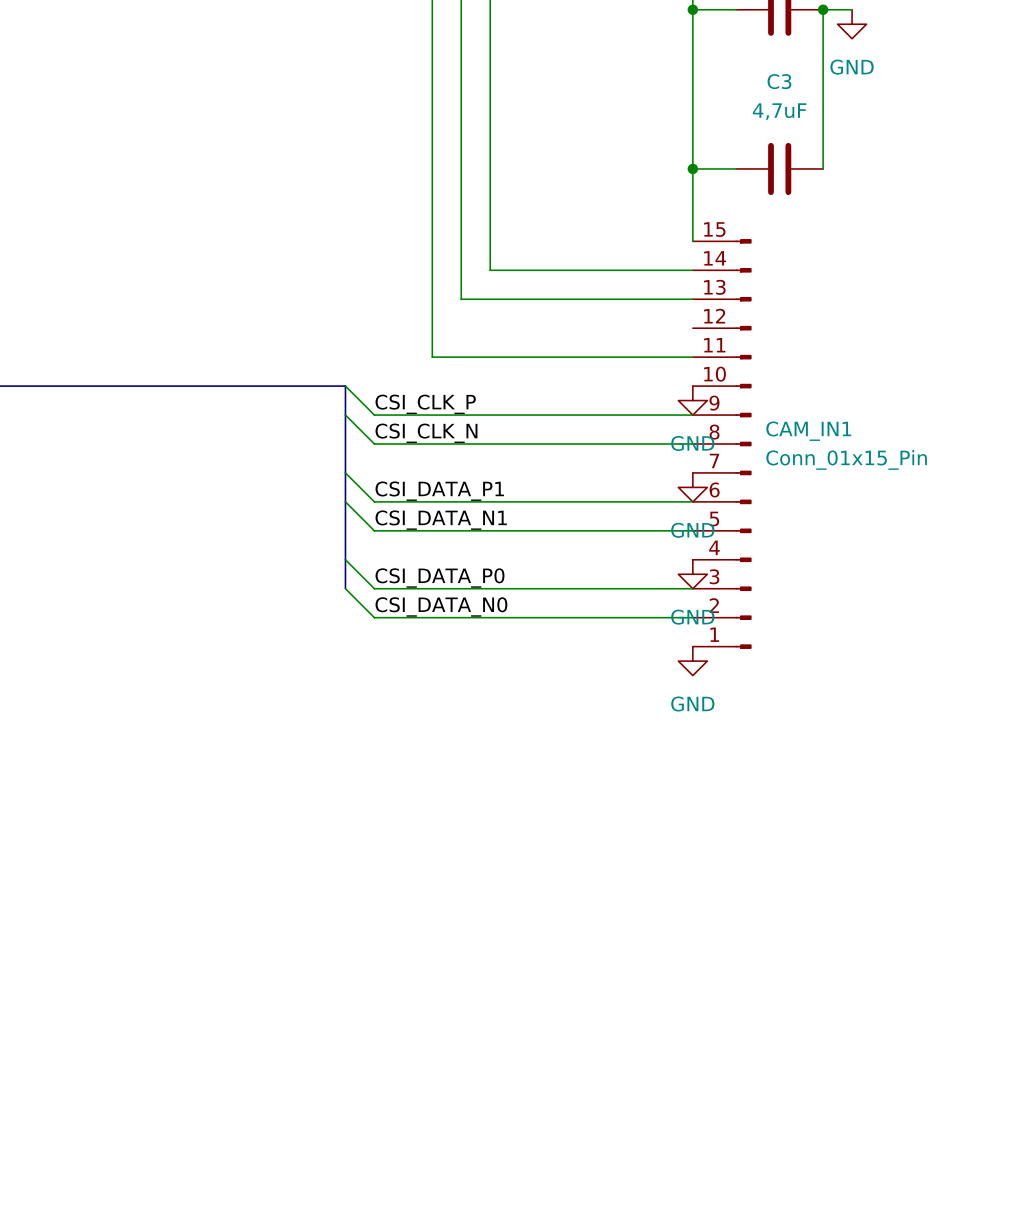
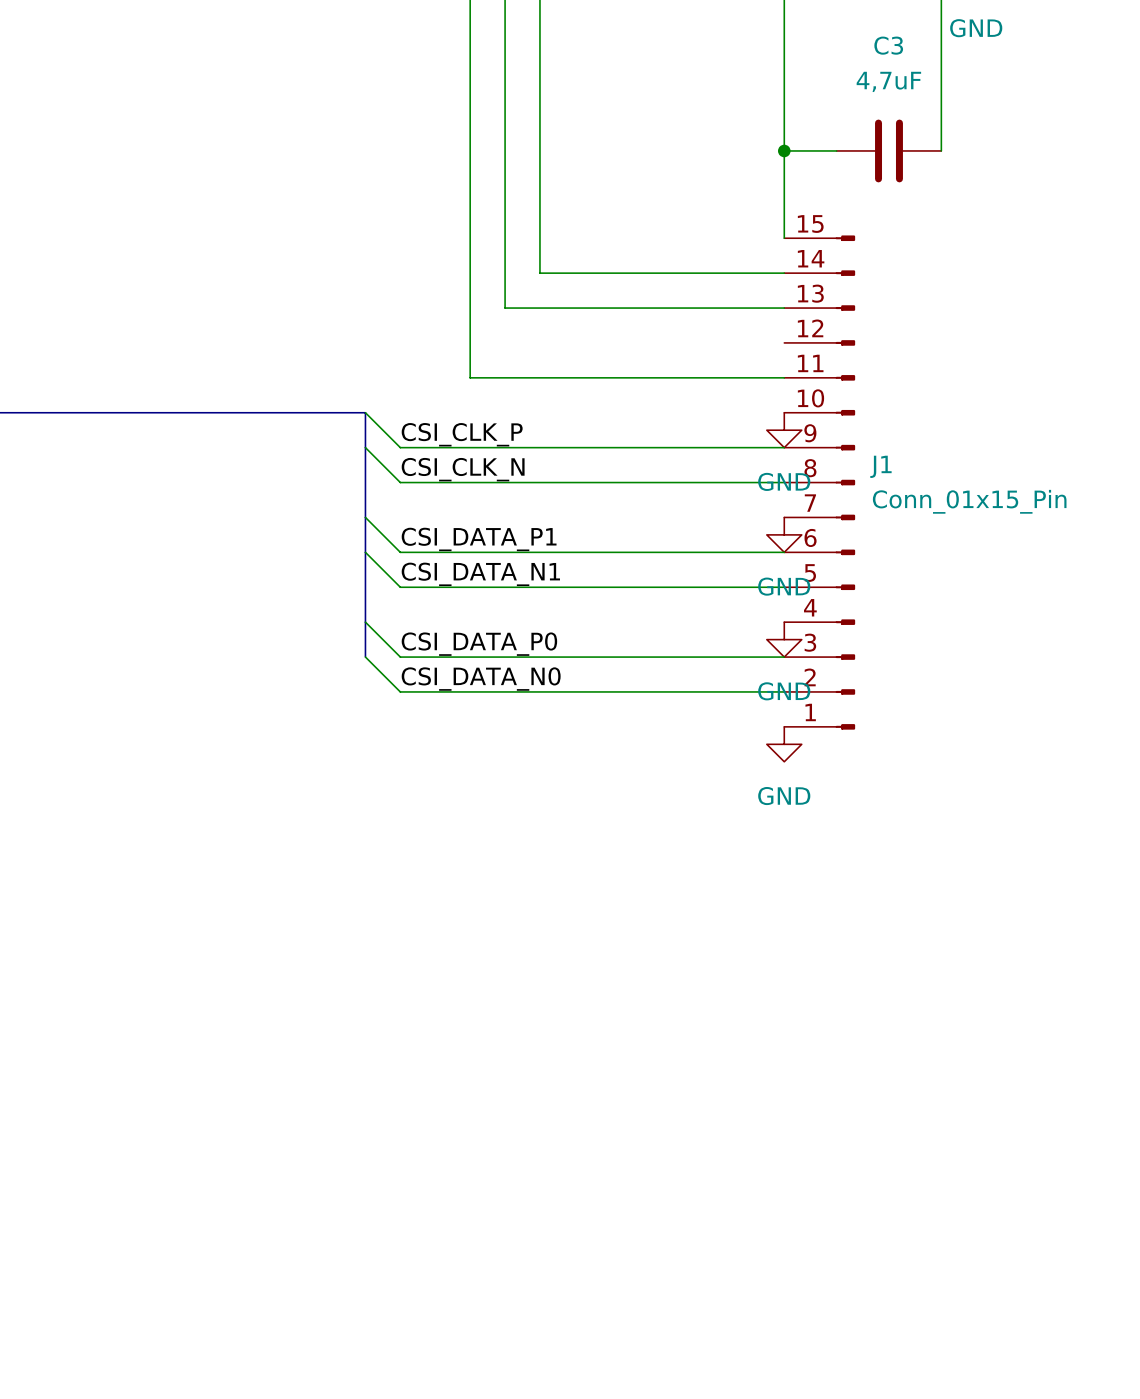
CAM_IN1 name: CAM_IN1 (808, 431) -> J1 (880, 466)

